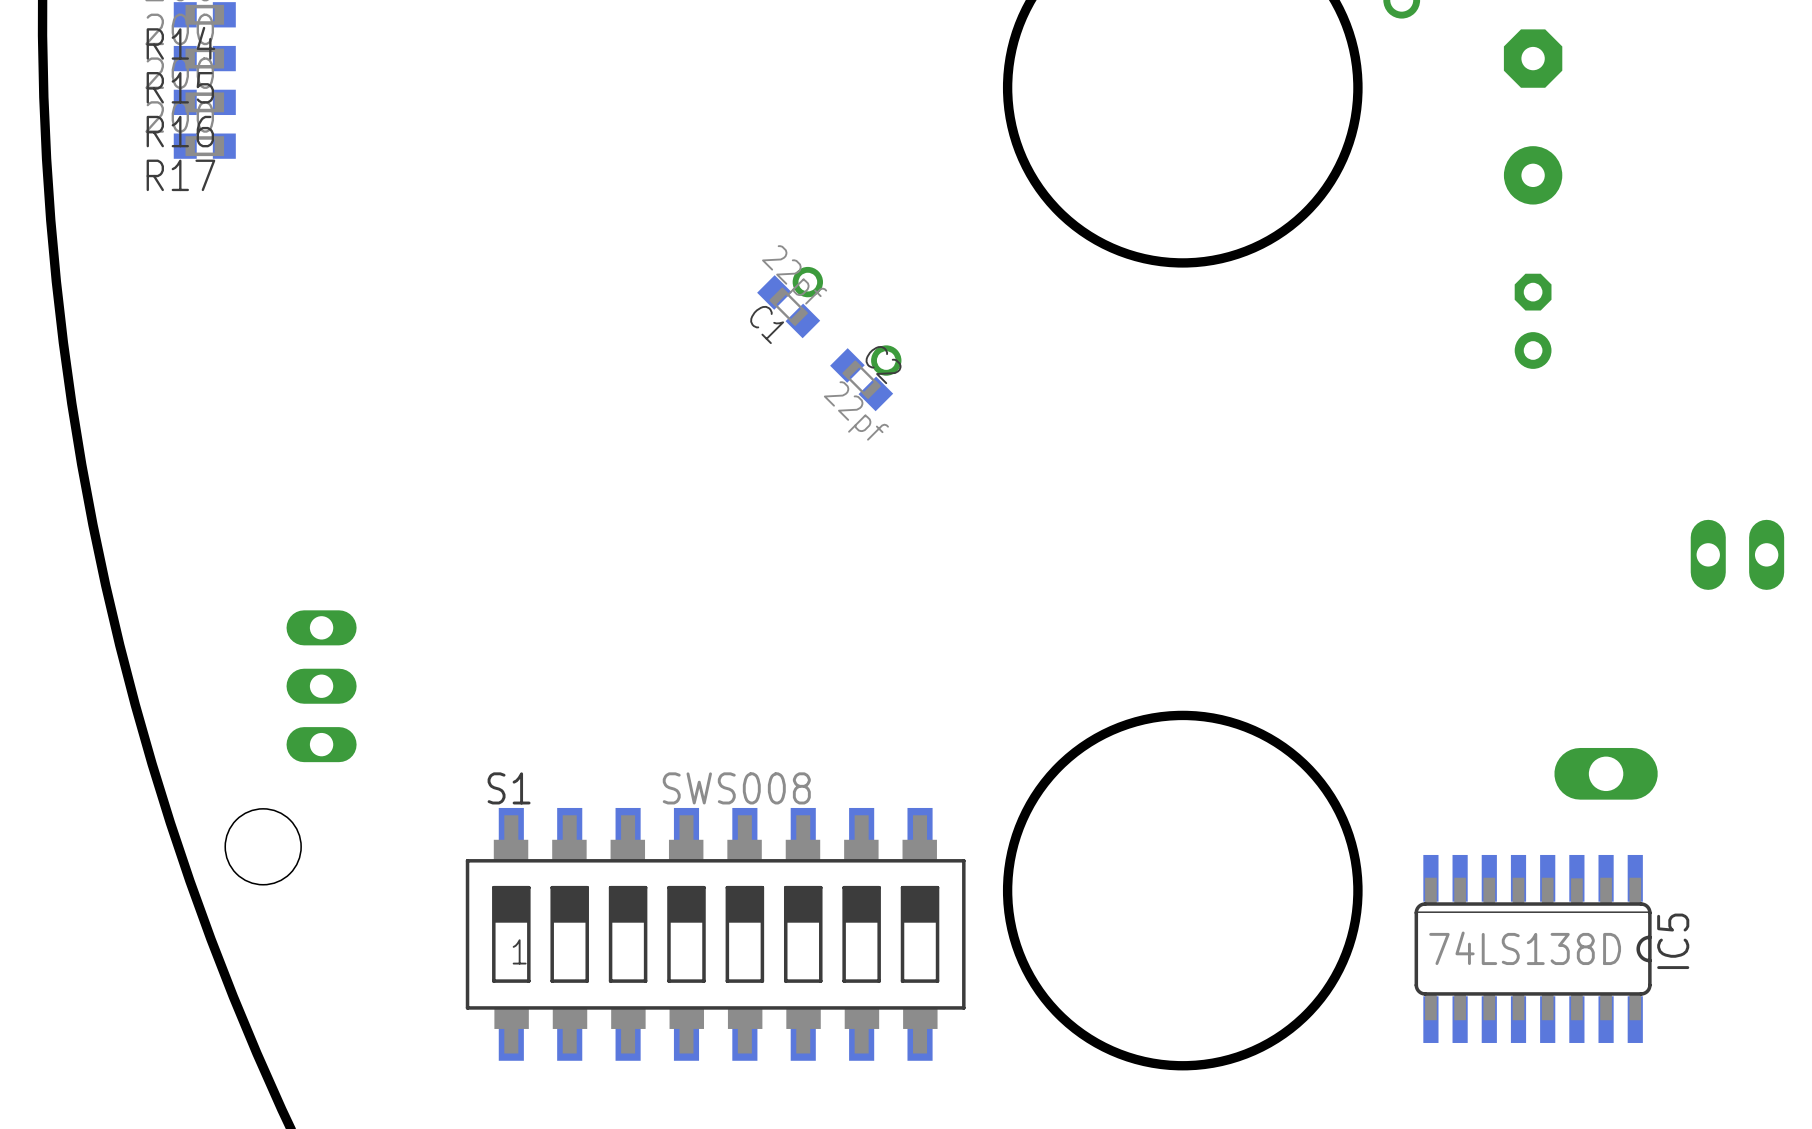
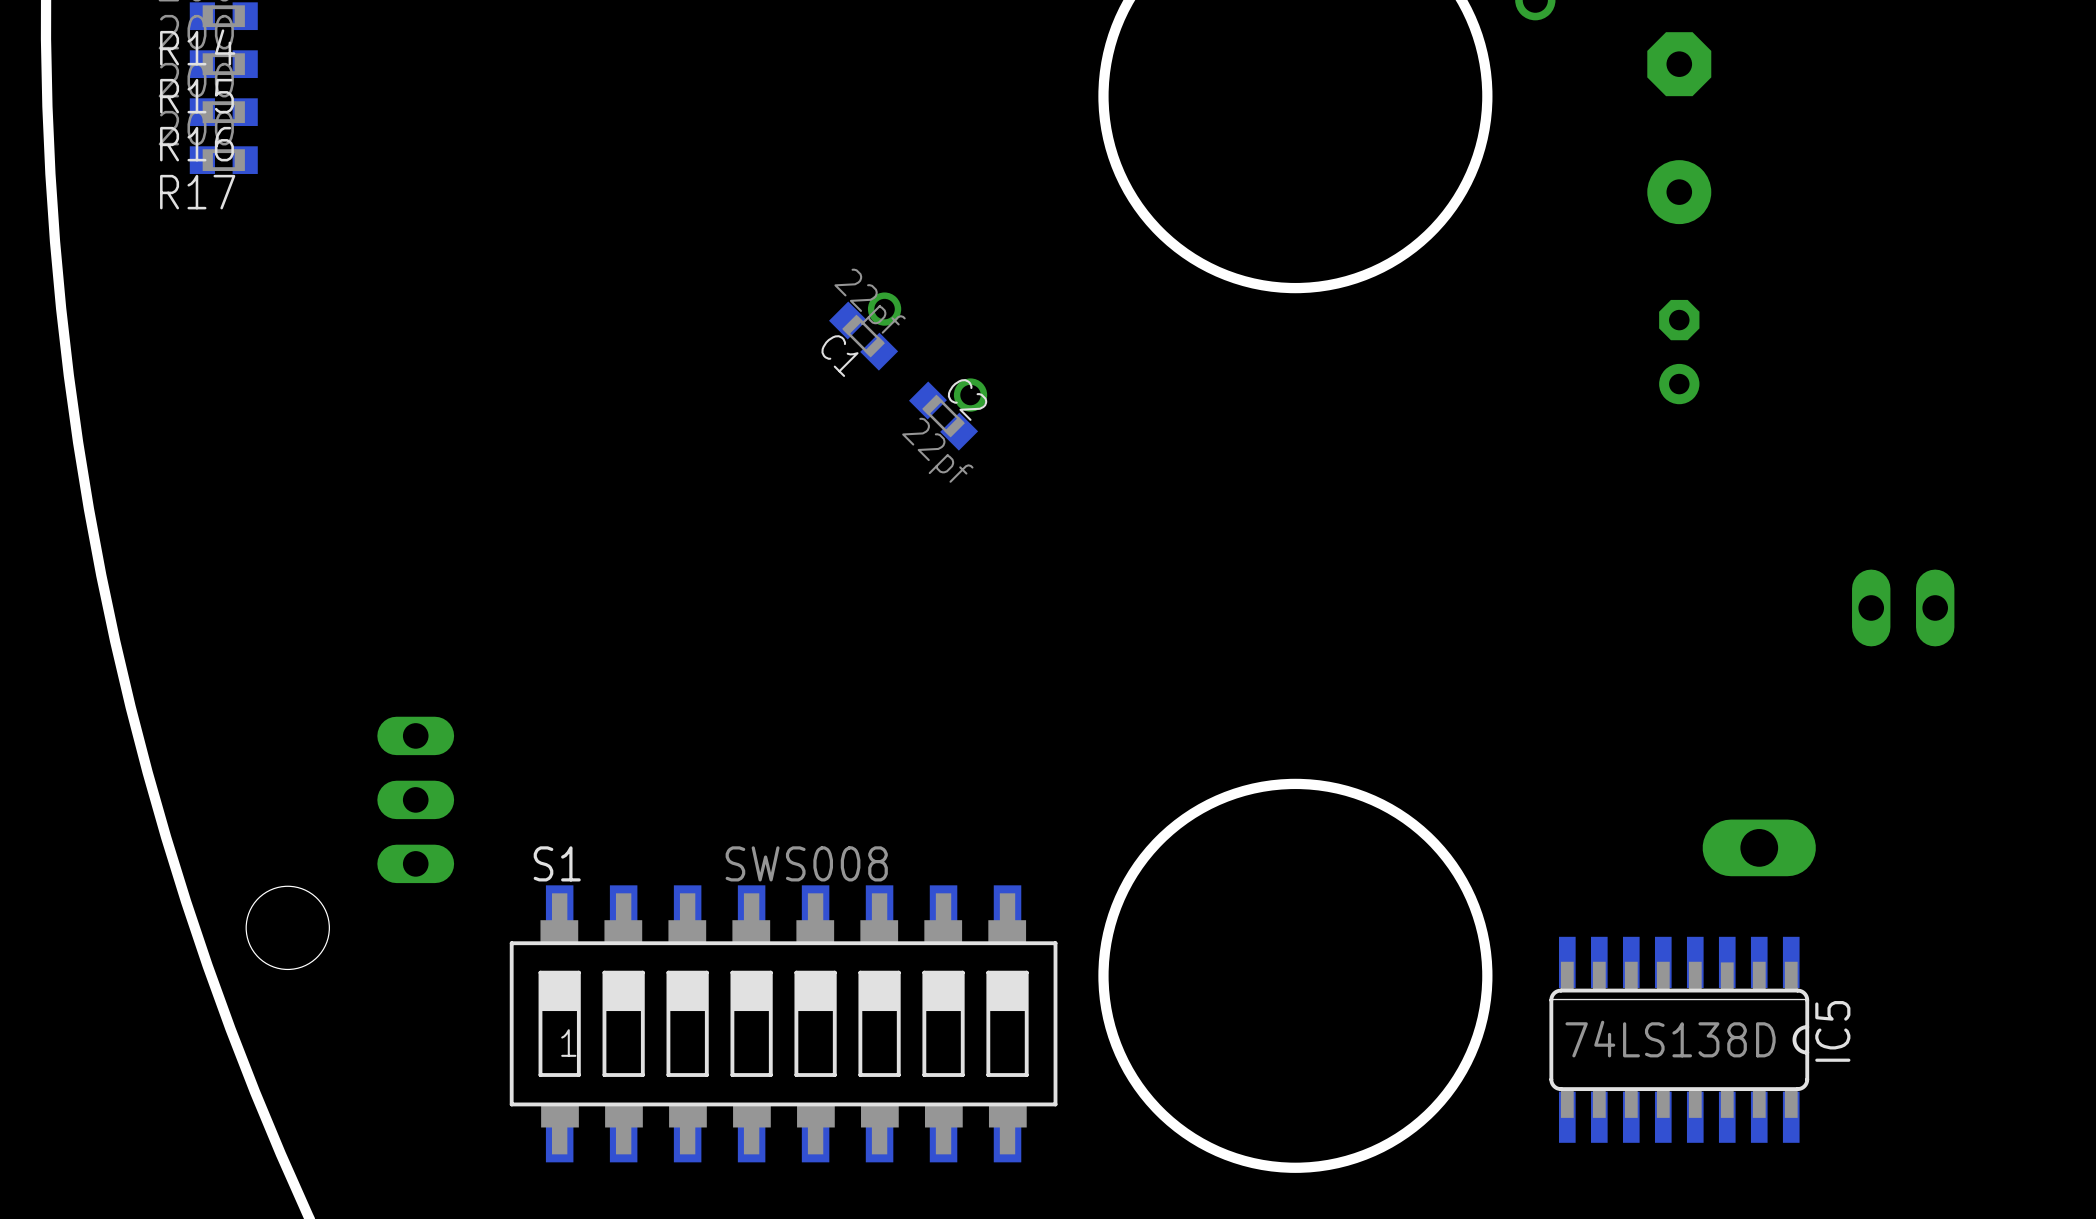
part position: (321, 686) -> (415, 799)

